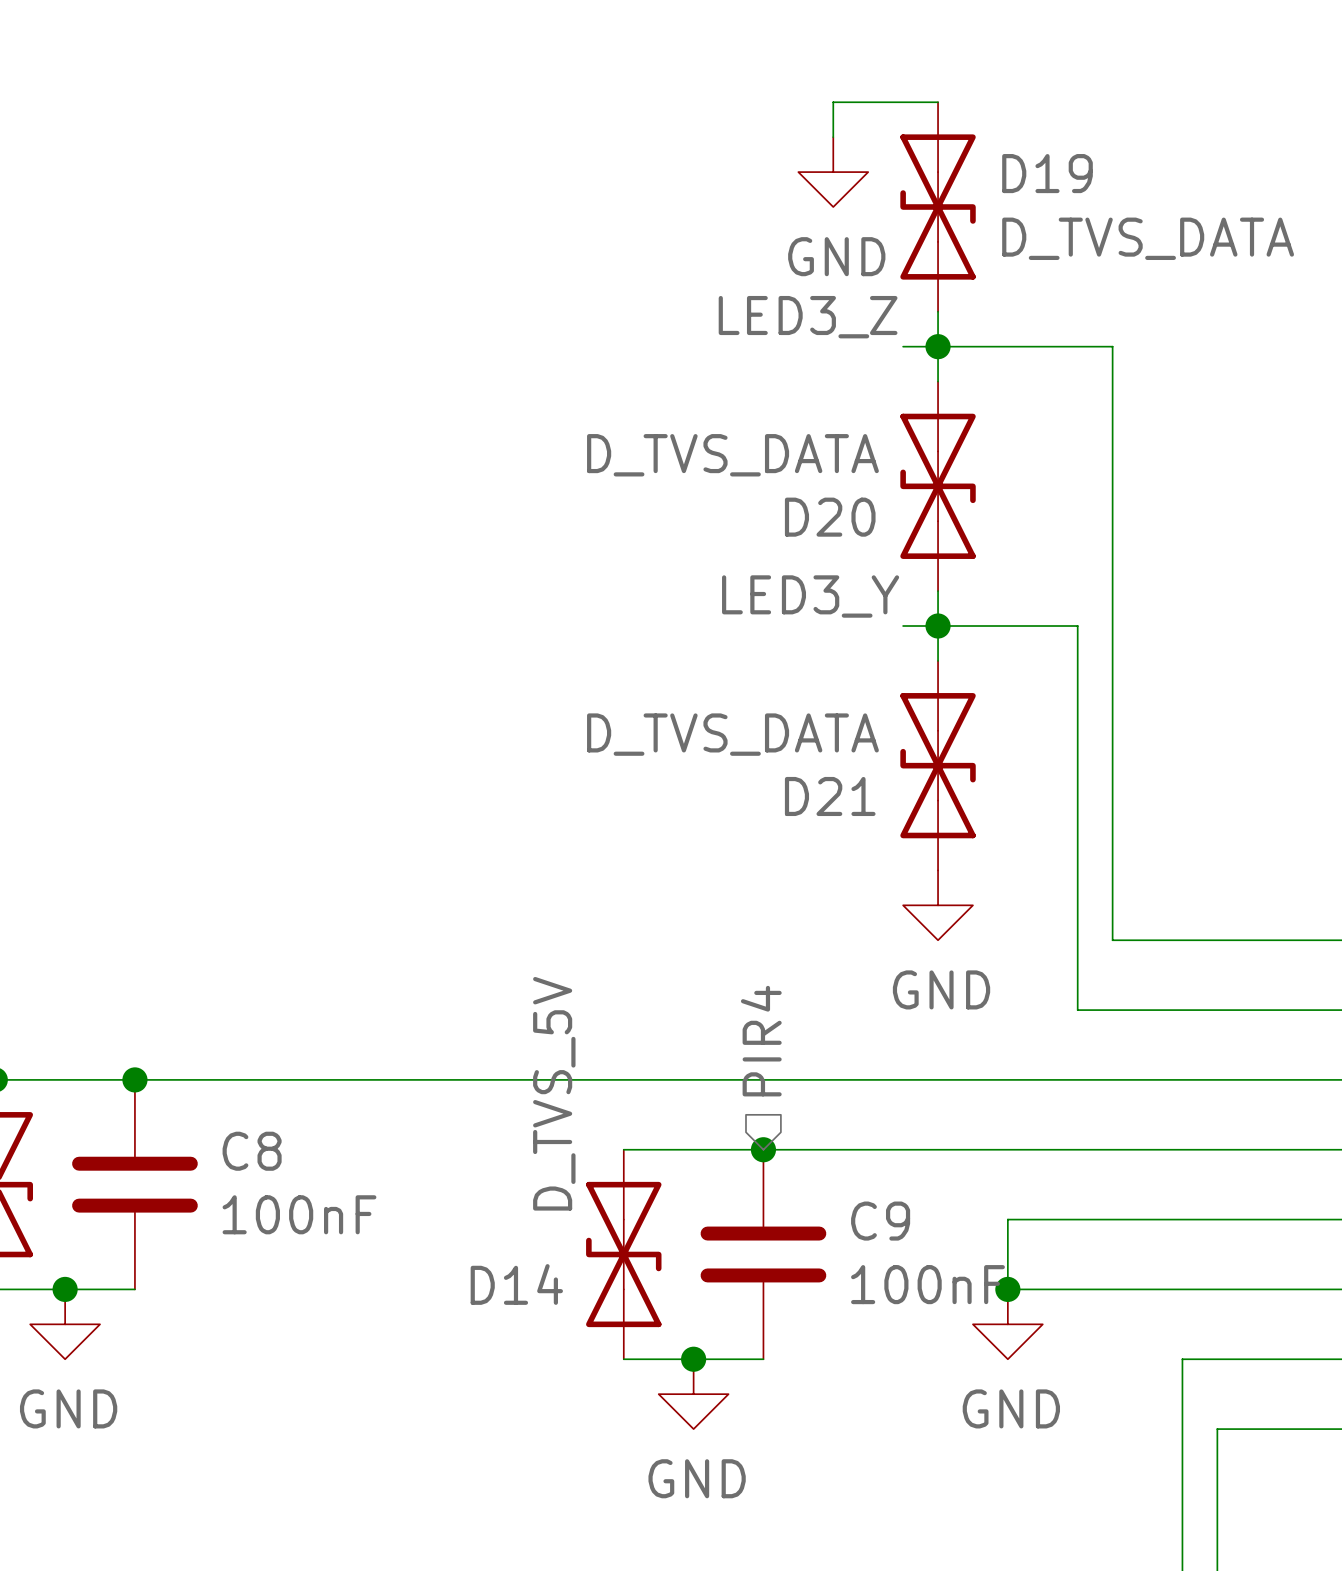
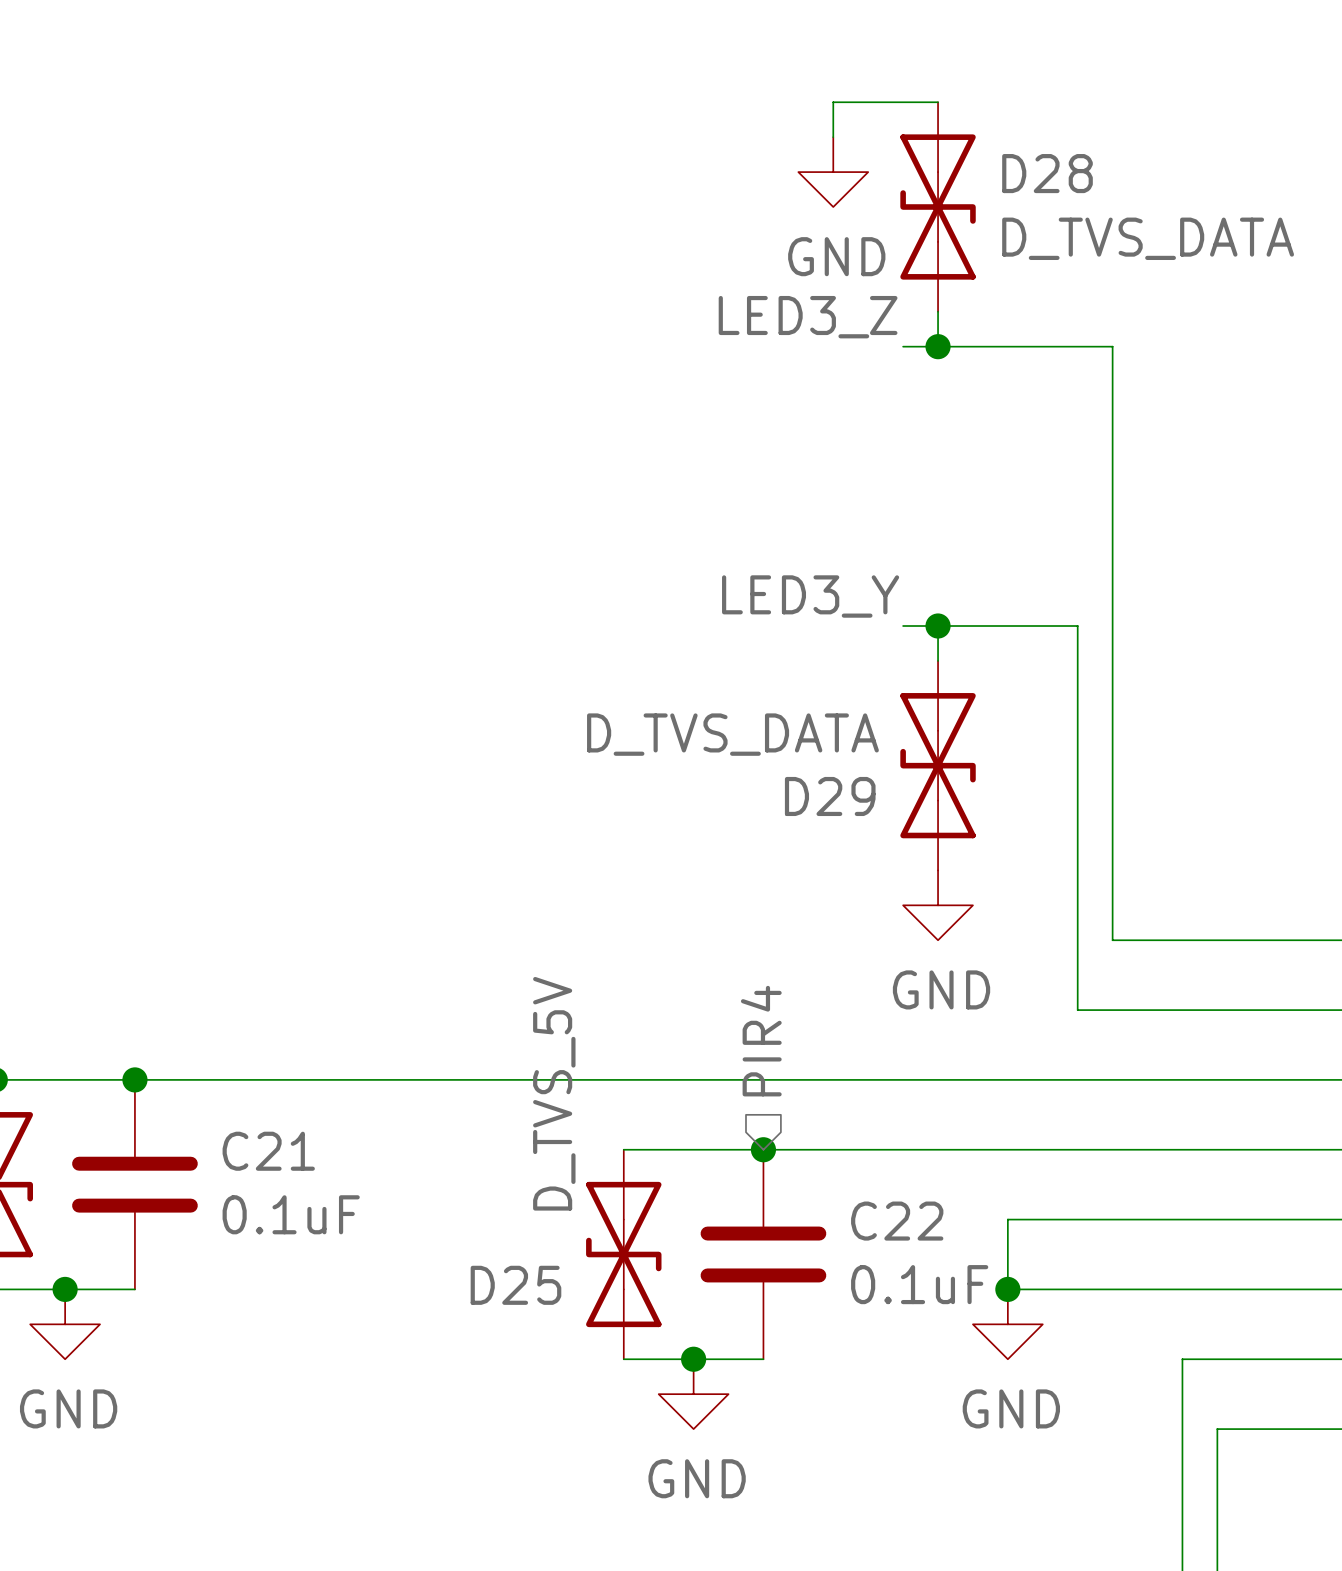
D19 name: D19 (1047, 173) -> D28 (1047, 173)
wire: (938, 346) (938, 381) -> none
D20: D_TVS_DATA (938, 486) -> none
wire: (938, 591) (938, 626) -> none
D21 name: D21 (830, 796) -> D29 (830, 796)
C8 name: C8 (252, 1151) -> C21 (268, 1151)
C8 value: 100nF (299, 1214) -> 0.1uF (291, 1214)
C9 name: C9 (880, 1221) -> C22 (897, 1221)
D14 name: D14 (516, 1284) -> D25 (515, 1285)
C9 value: 100nF (927, 1284) -> 0.1uF (919, 1284)

